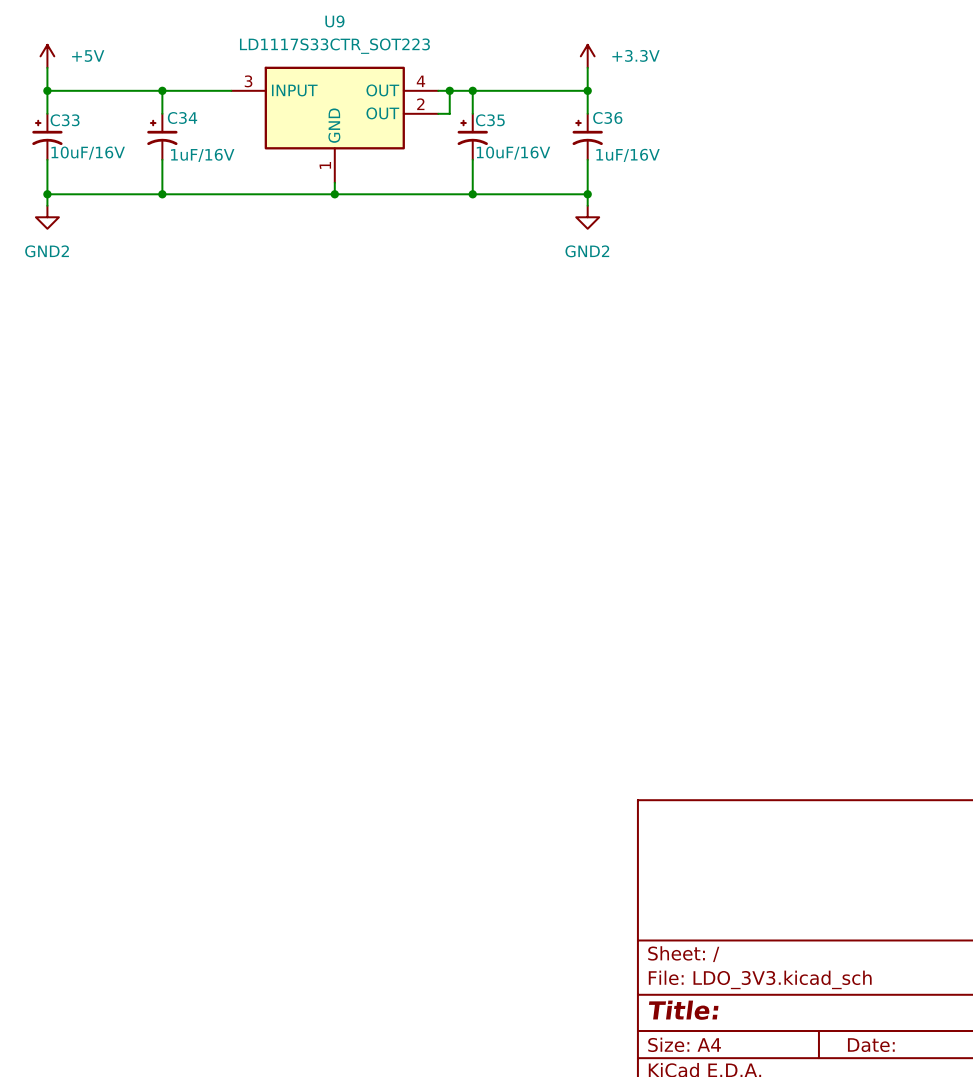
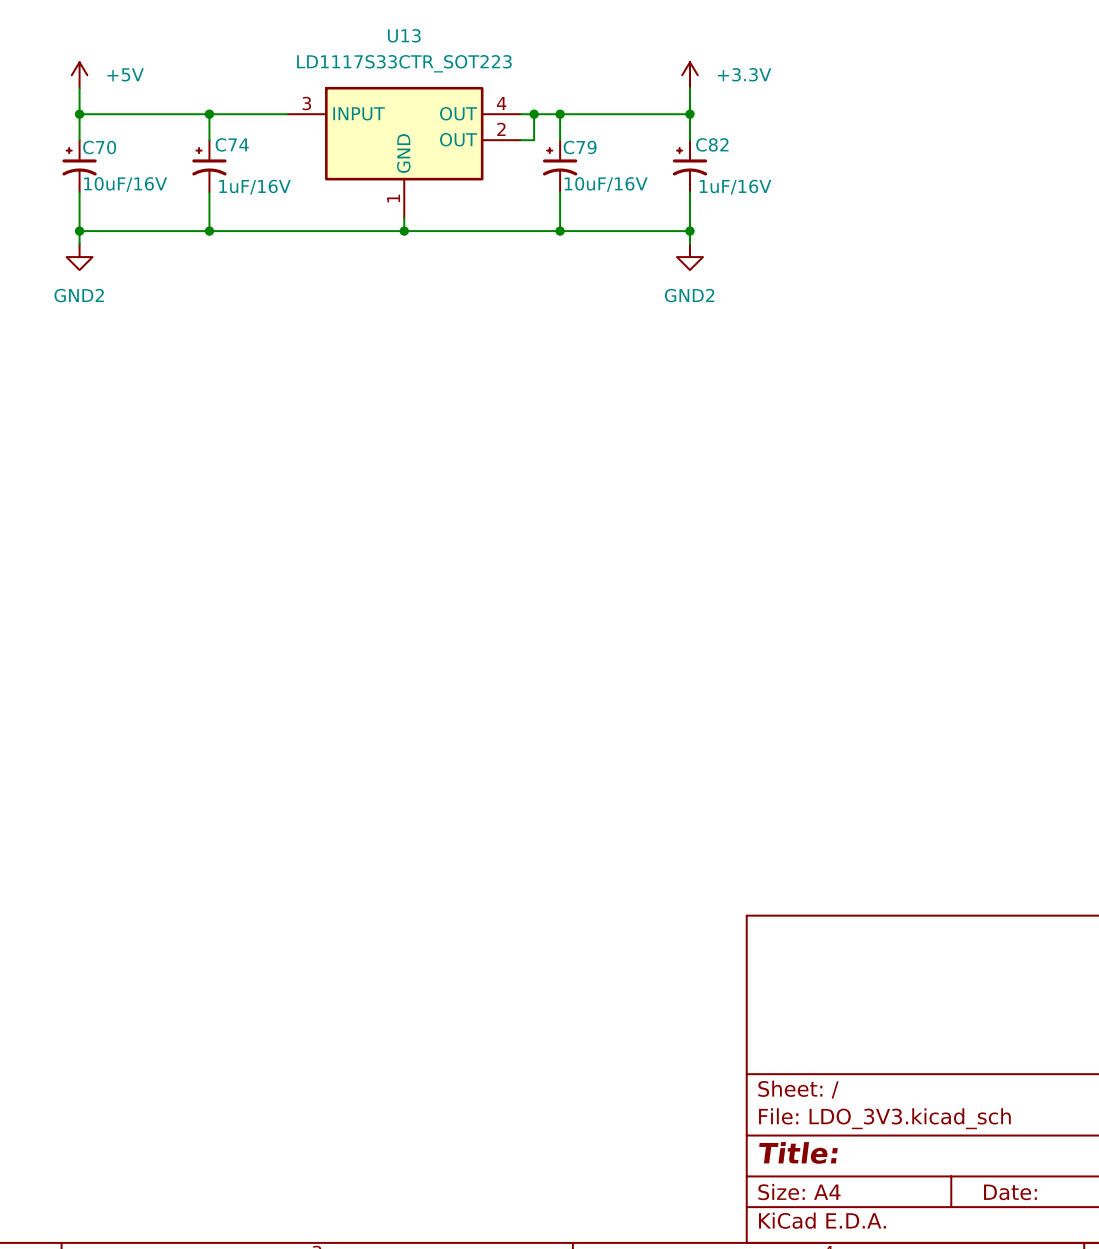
U9 name: U9 (334, 21) -> U13 (404, 35)
C34 name: C34 (182, 118) -> C74 (232, 144)
C36 name: C36 (607, 118) -> C82 (712, 144)
C33 name: C33 (65, 120) -> C70 (99, 147)
C35 name: C35 (490, 120) -> C79 (580, 147)

